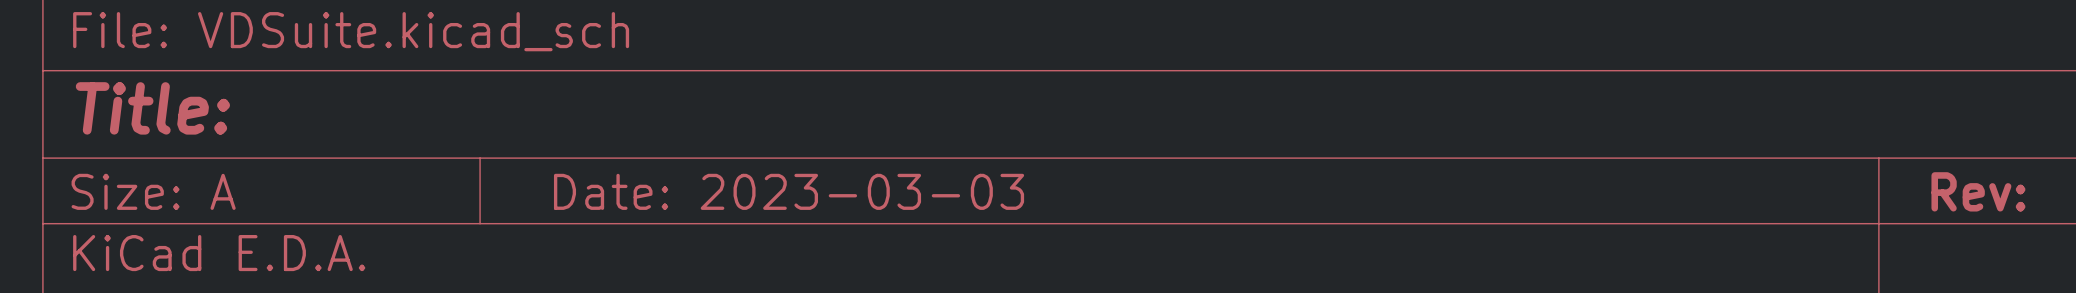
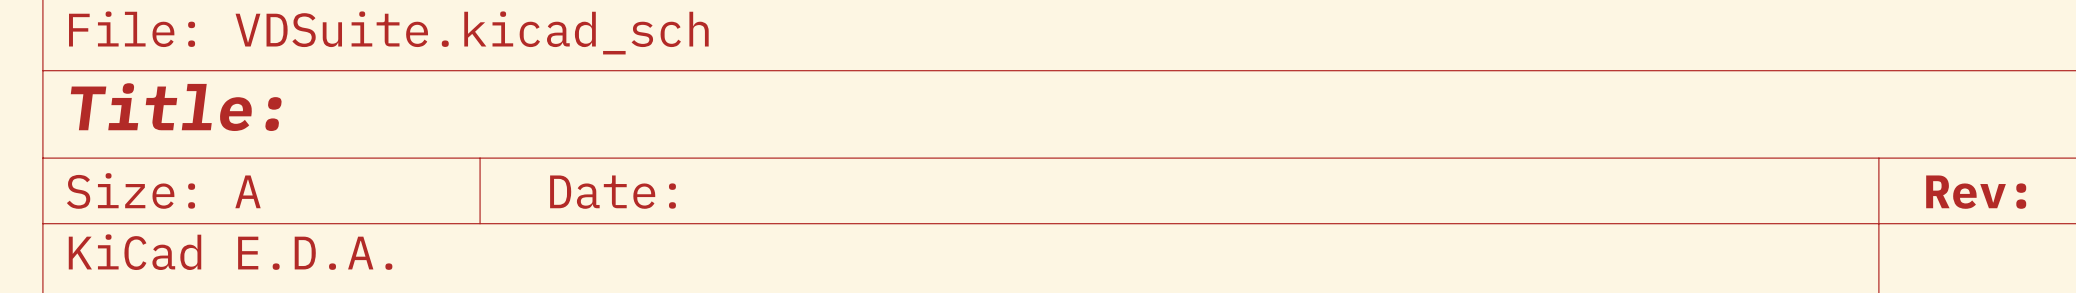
title block: Date: 2023-03-03 (789, 191) -> Date: (613, 192)

